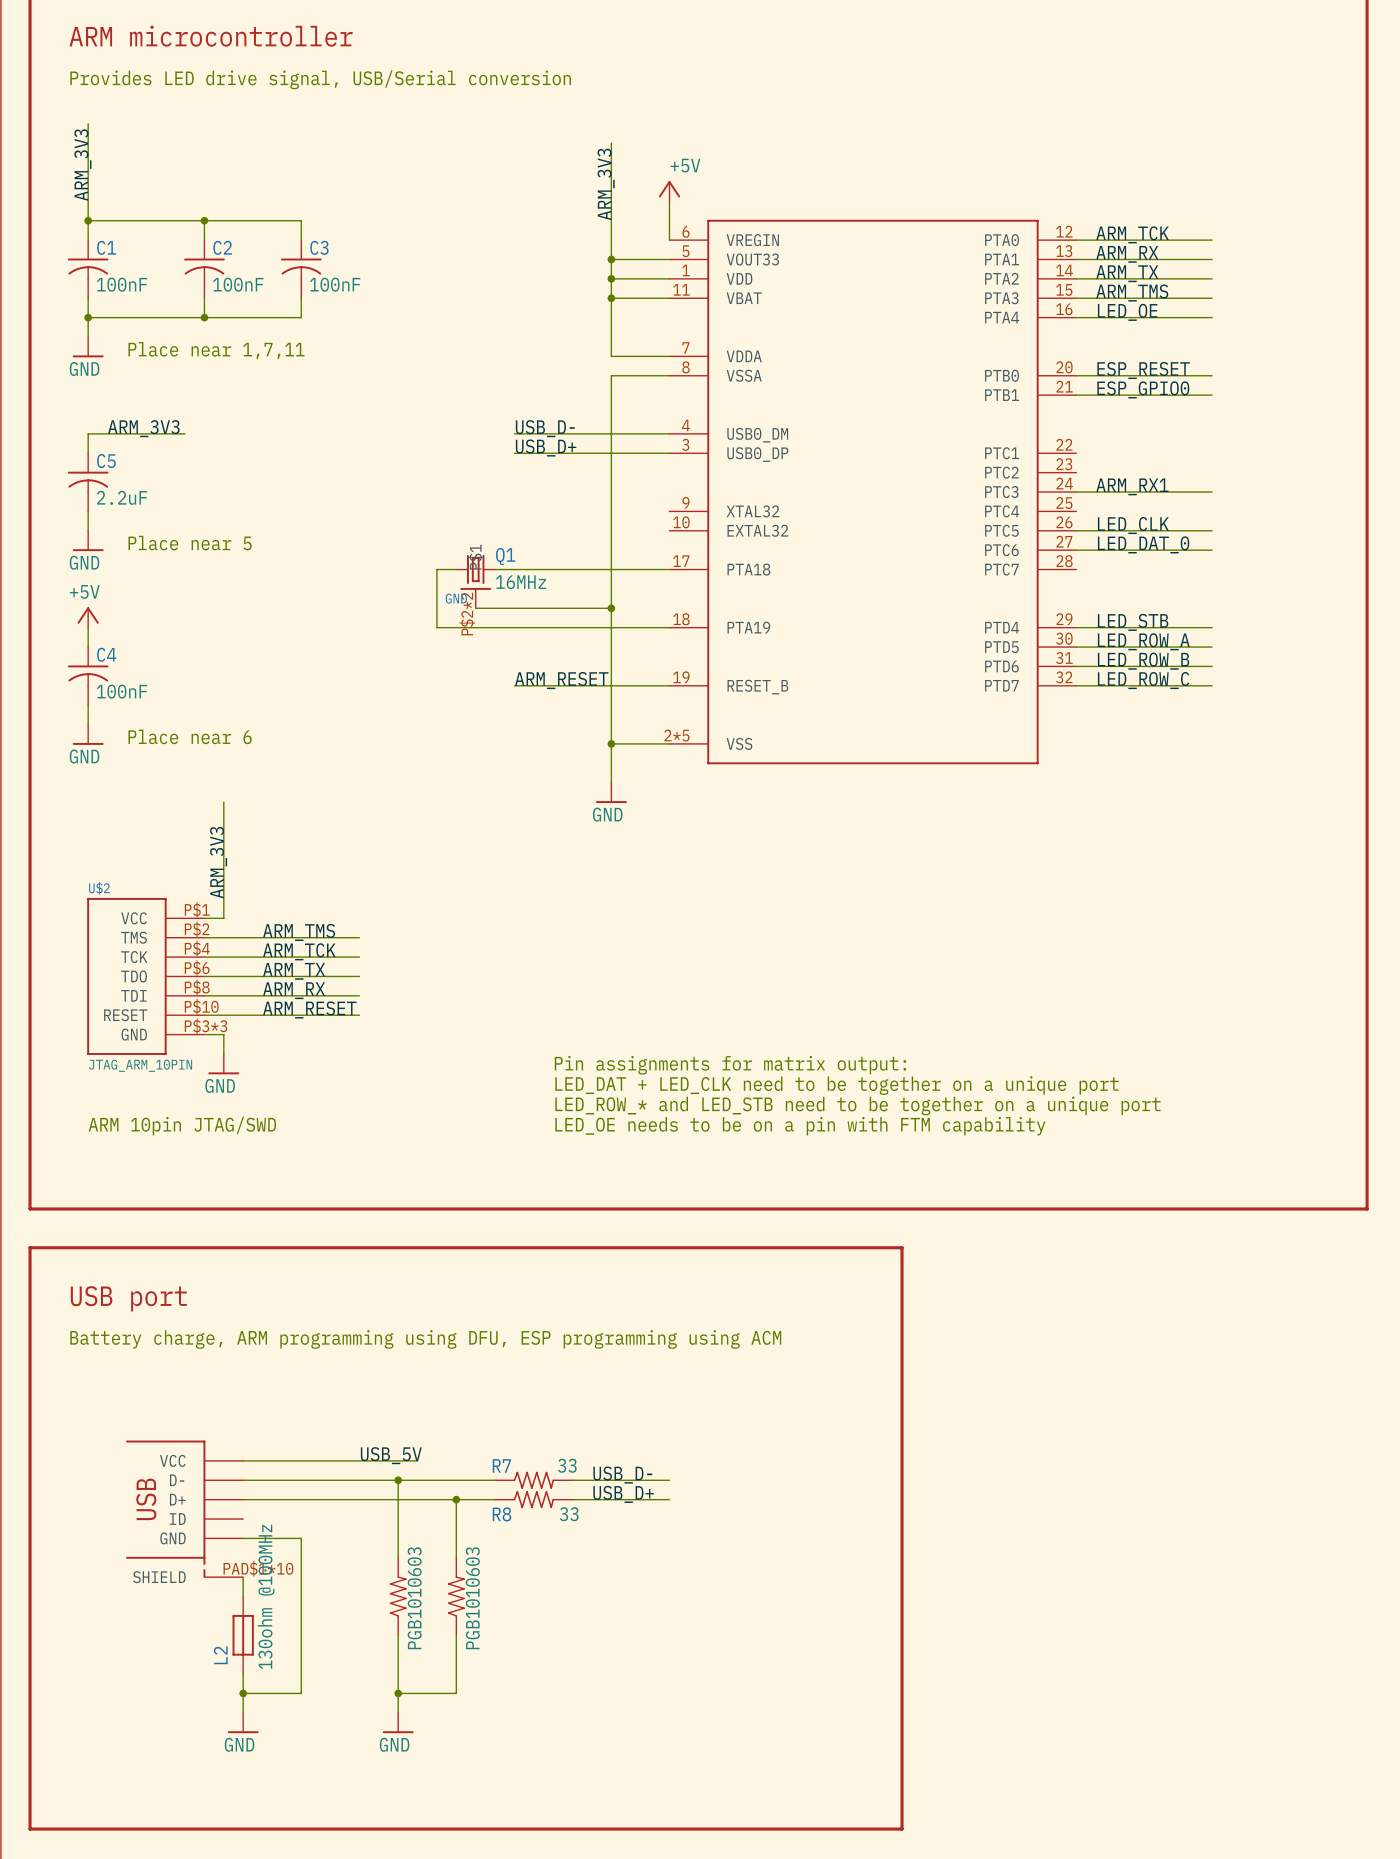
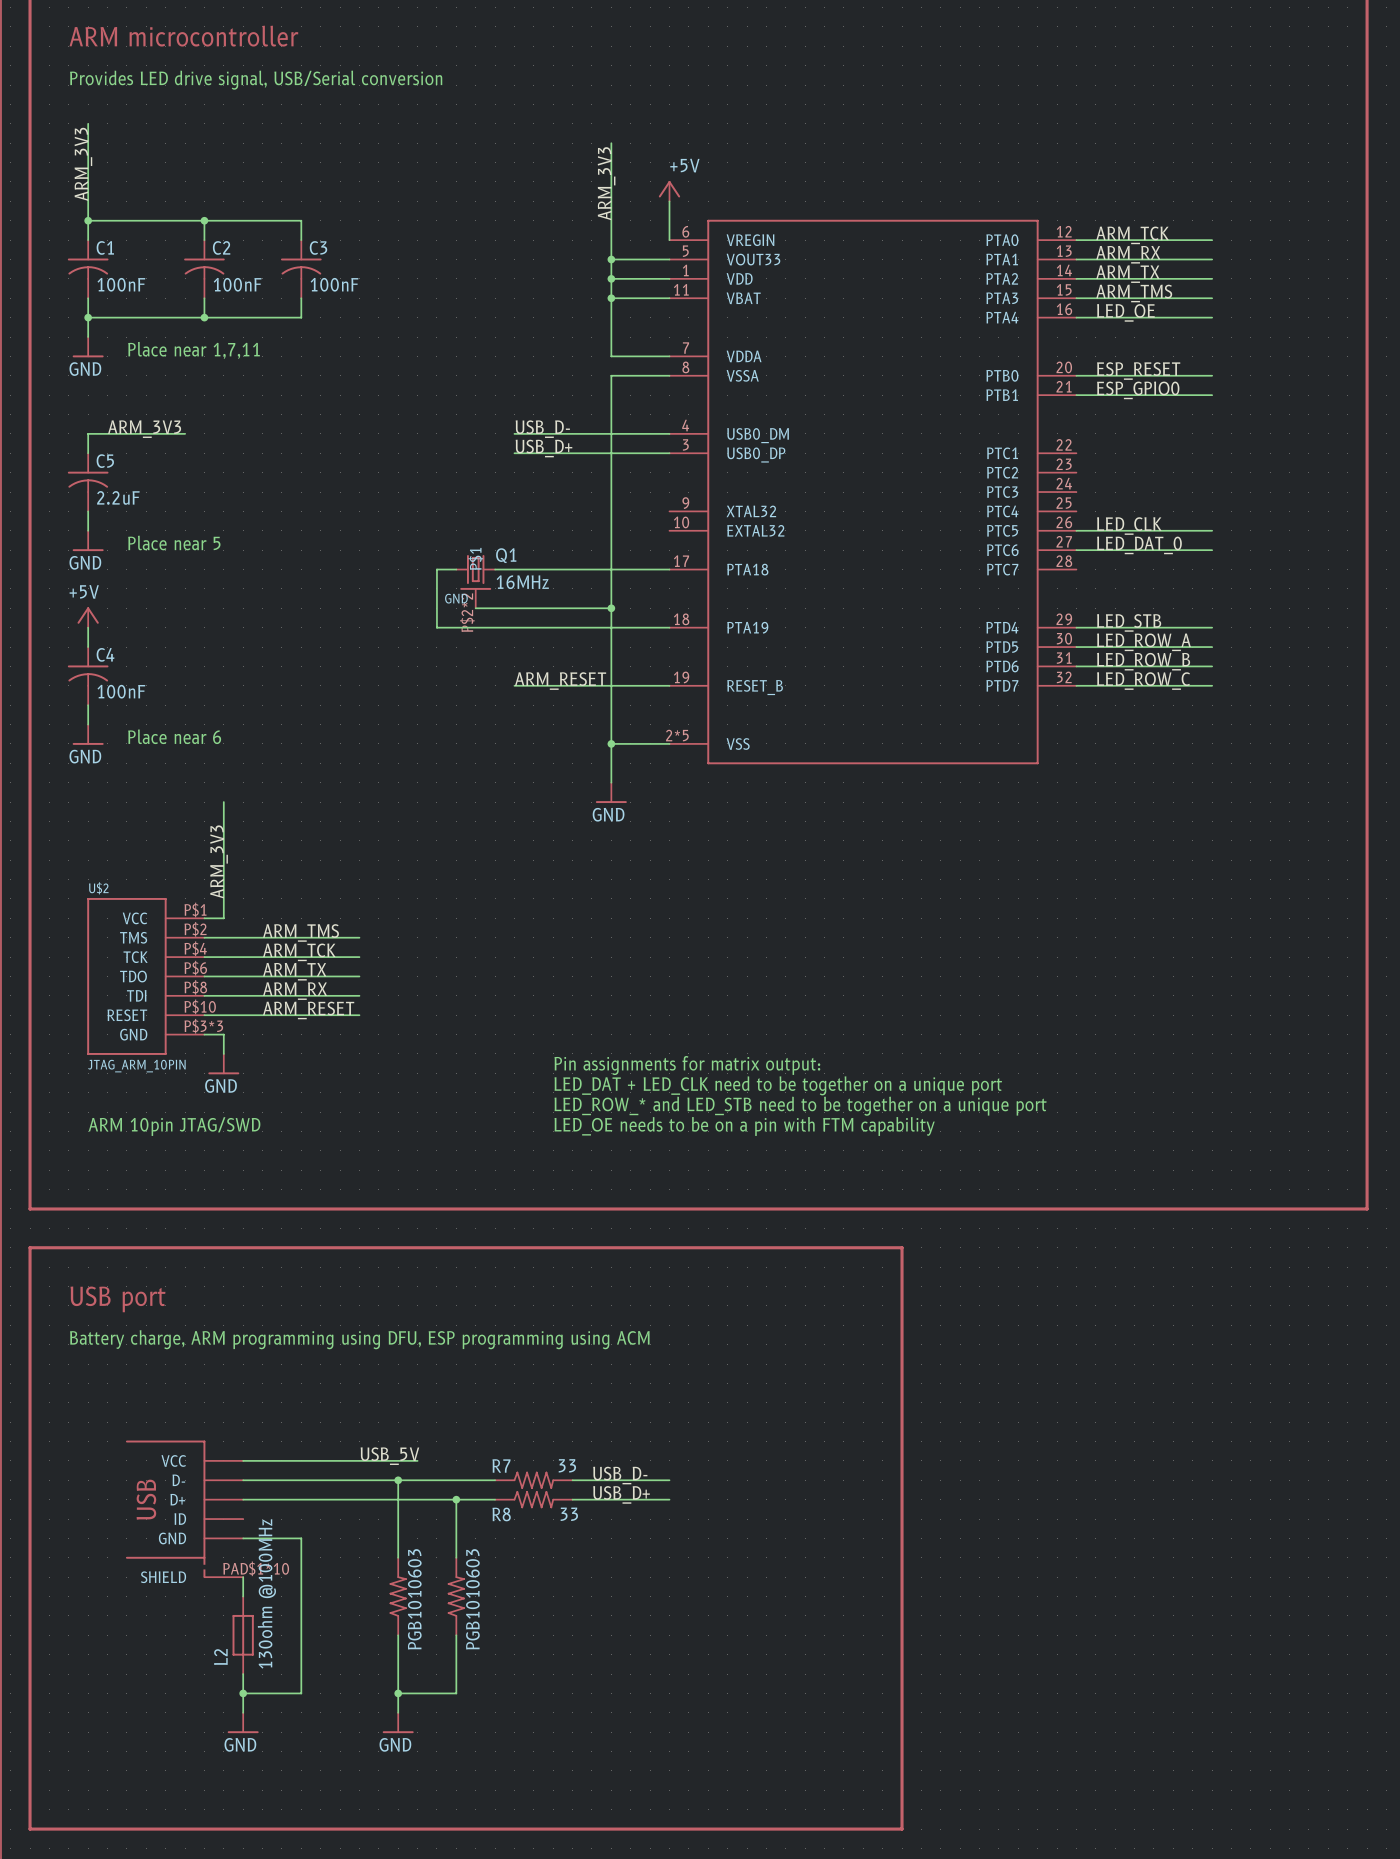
label: ARM_RX1 (1132, 486) -> none
wire: (1076, 492) (1212, 492) -> none

